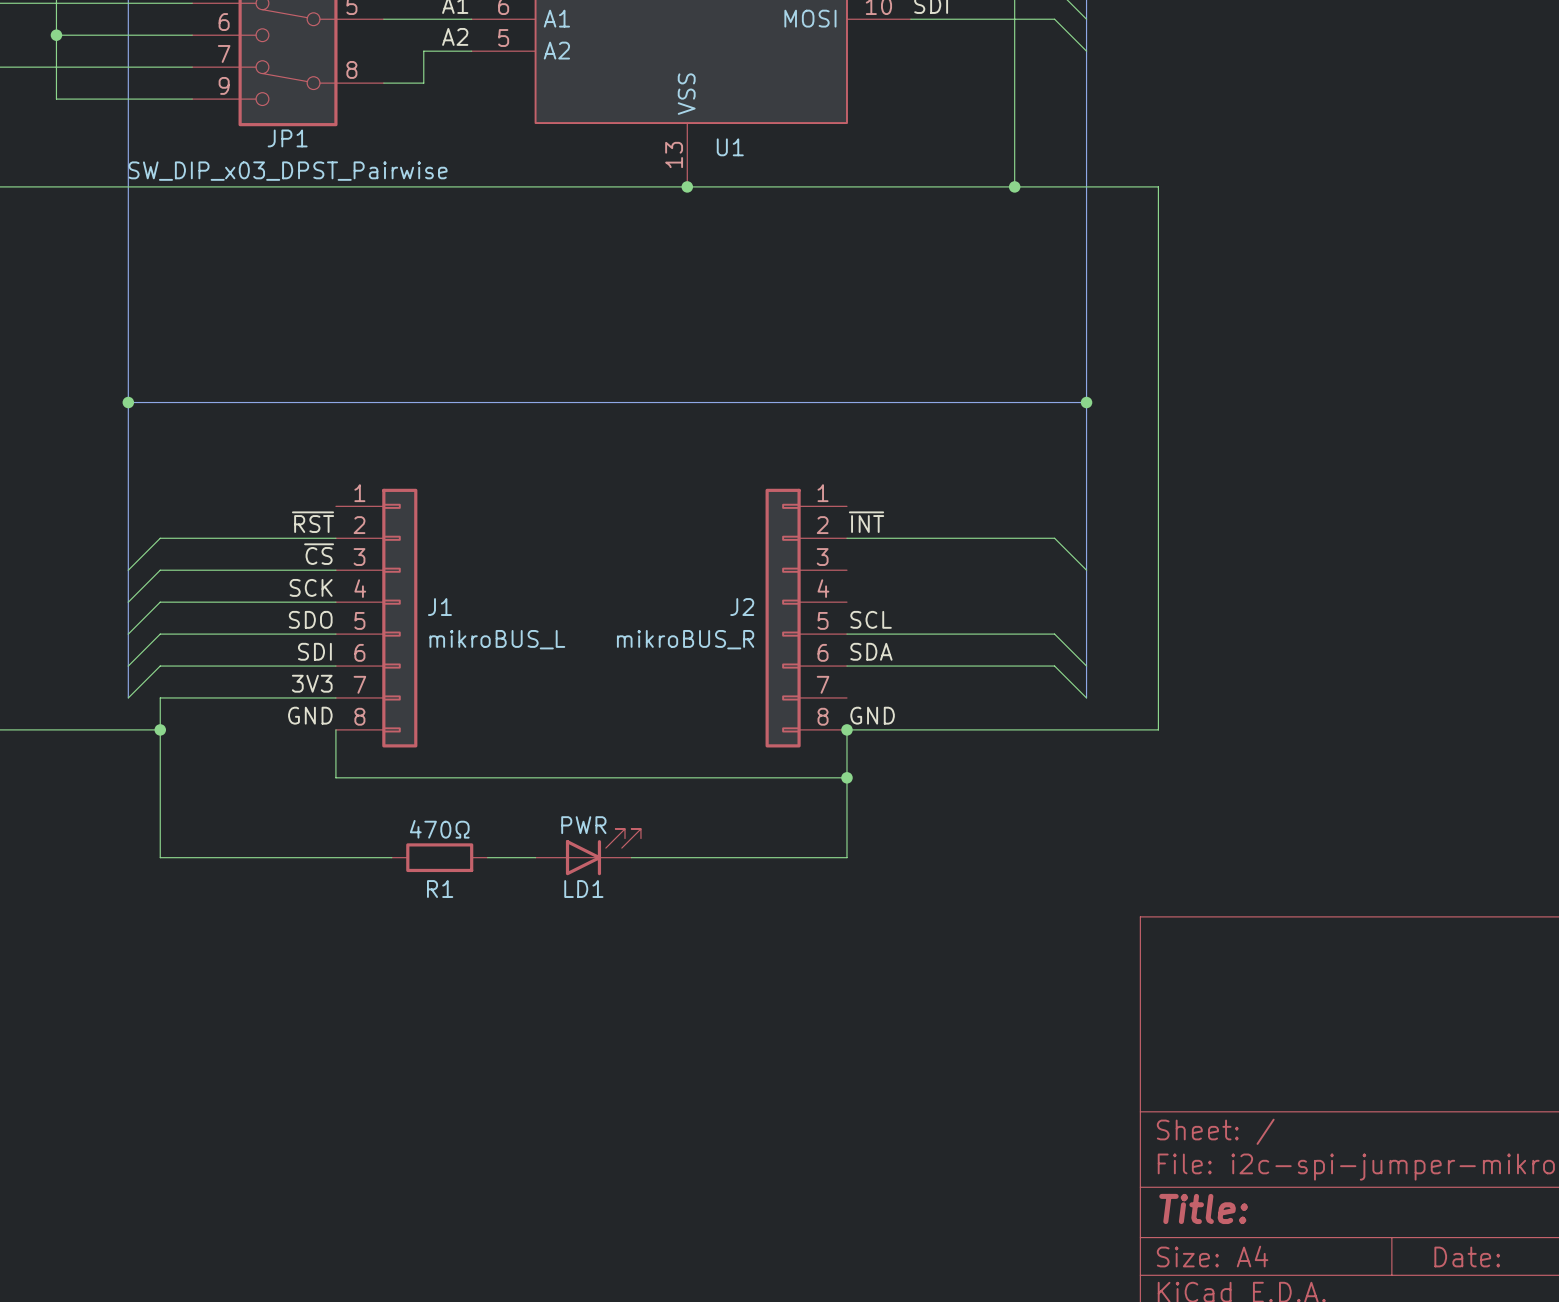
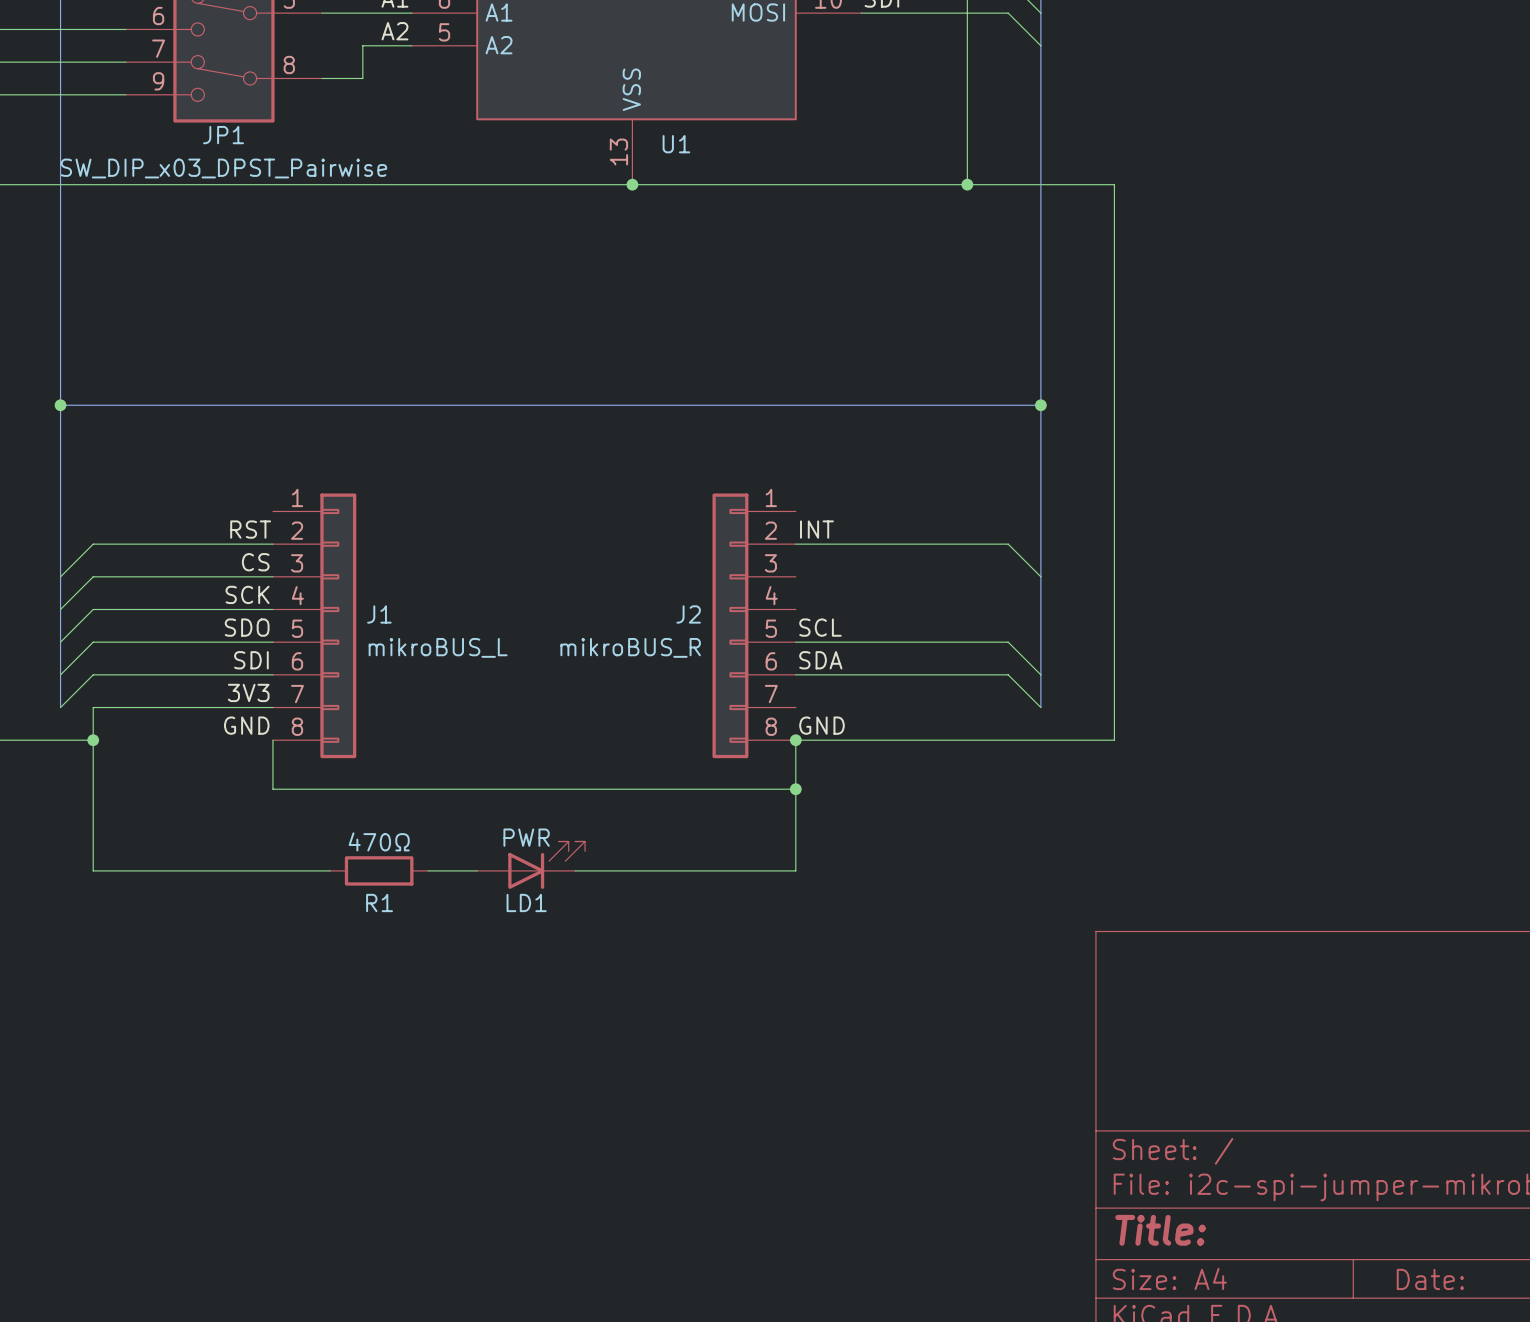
label: ~{RST} (313, 522) -> RST (250, 529)
label: ~{INT} (866, 522) -> INT (816, 529)
label: ~{CS} (319, 554) -> CS (255, 562)

